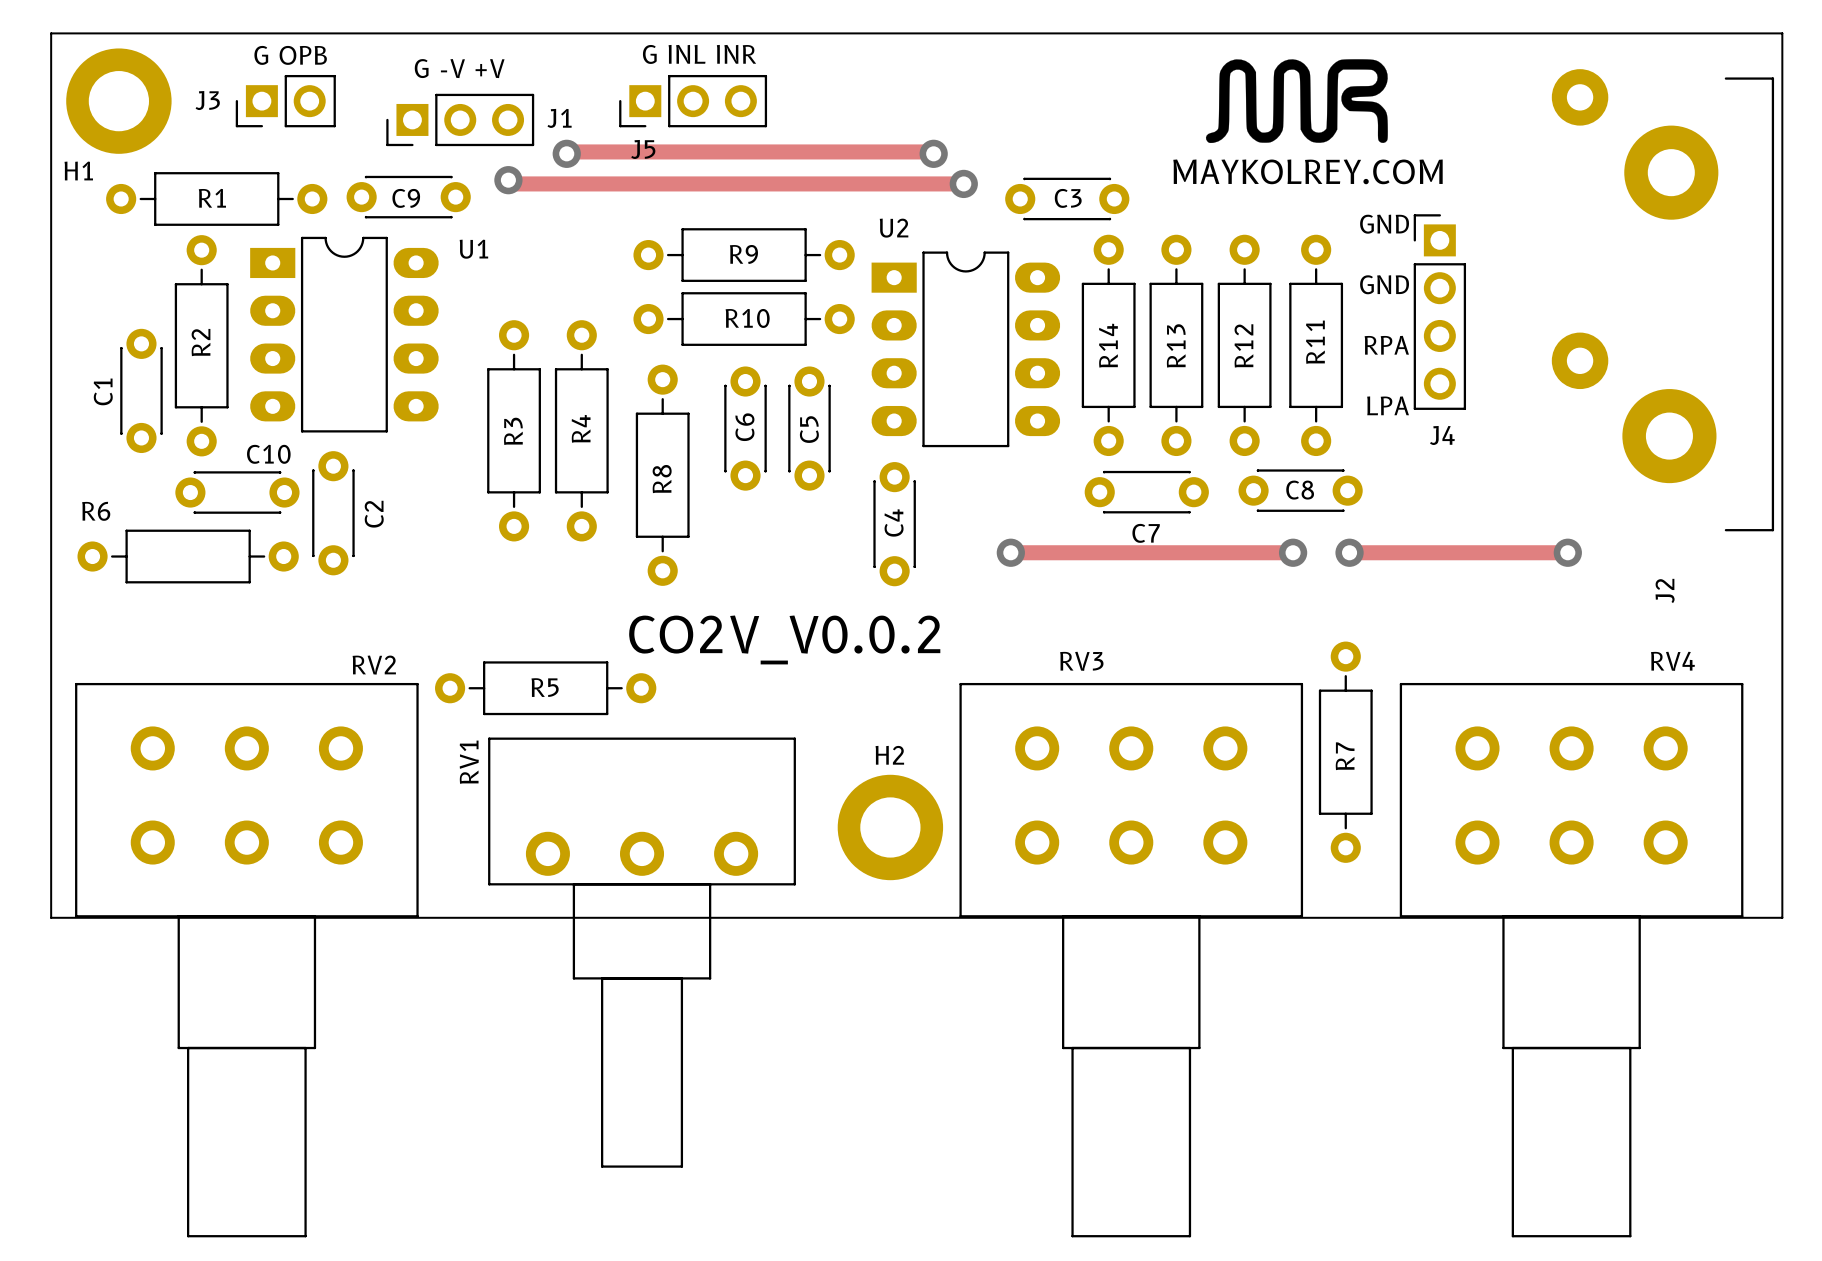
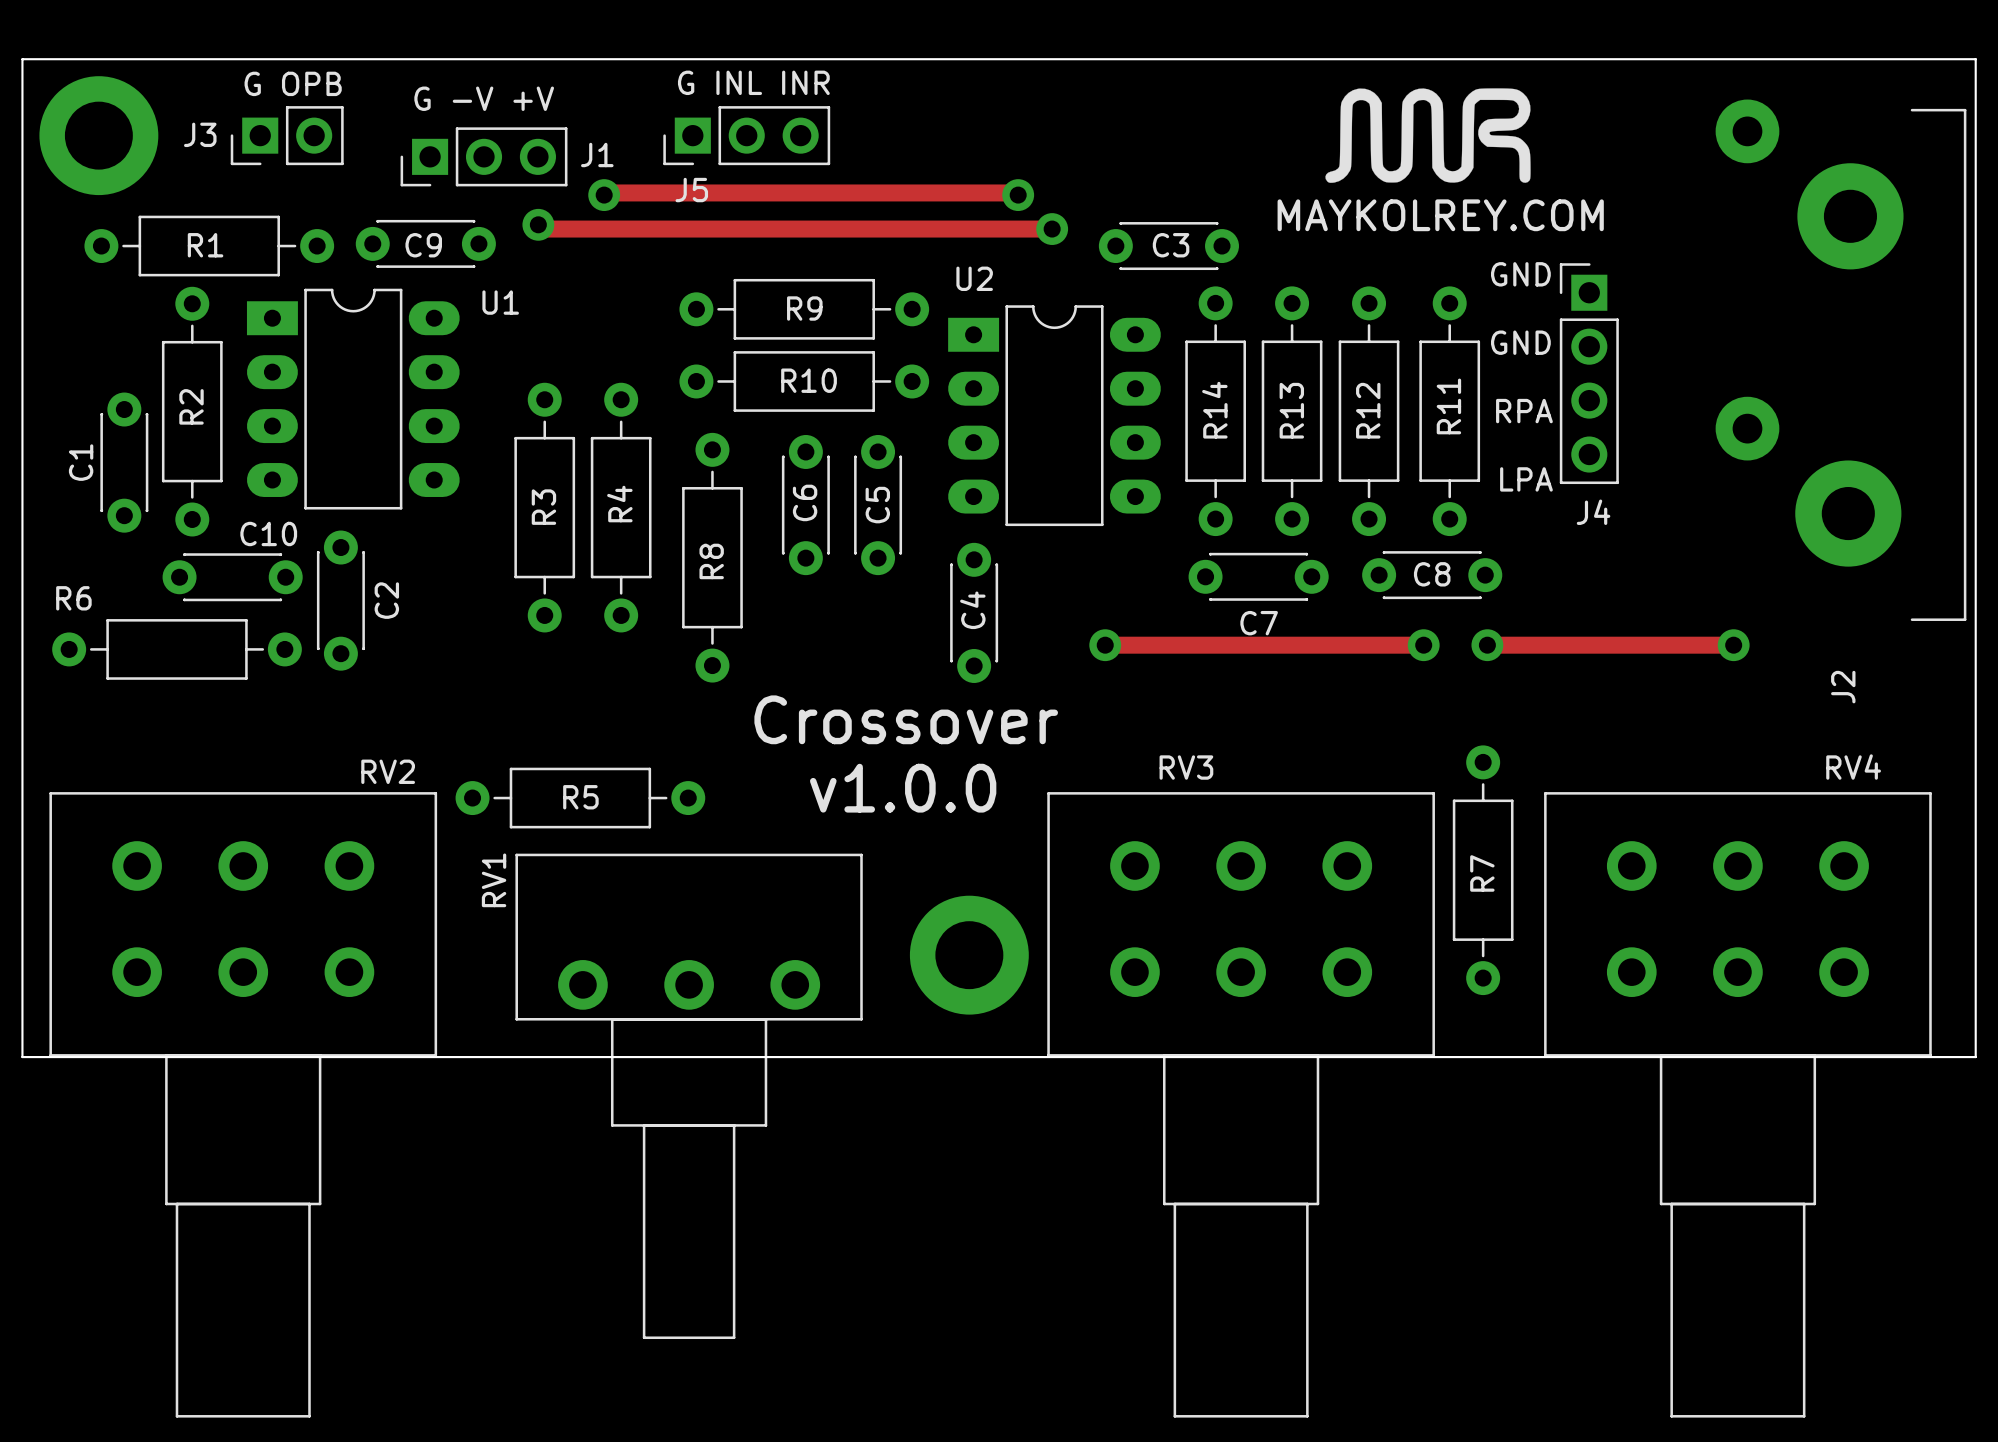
H1 name: H1 (78, 171) -> none
text: none -> Crossover (906, 719)
text: CO2V_V0.0.2 (784, 639) -> none
text: none -> v1.0.0 (903, 788)
H2 name: H2 (889, 755) -> none

